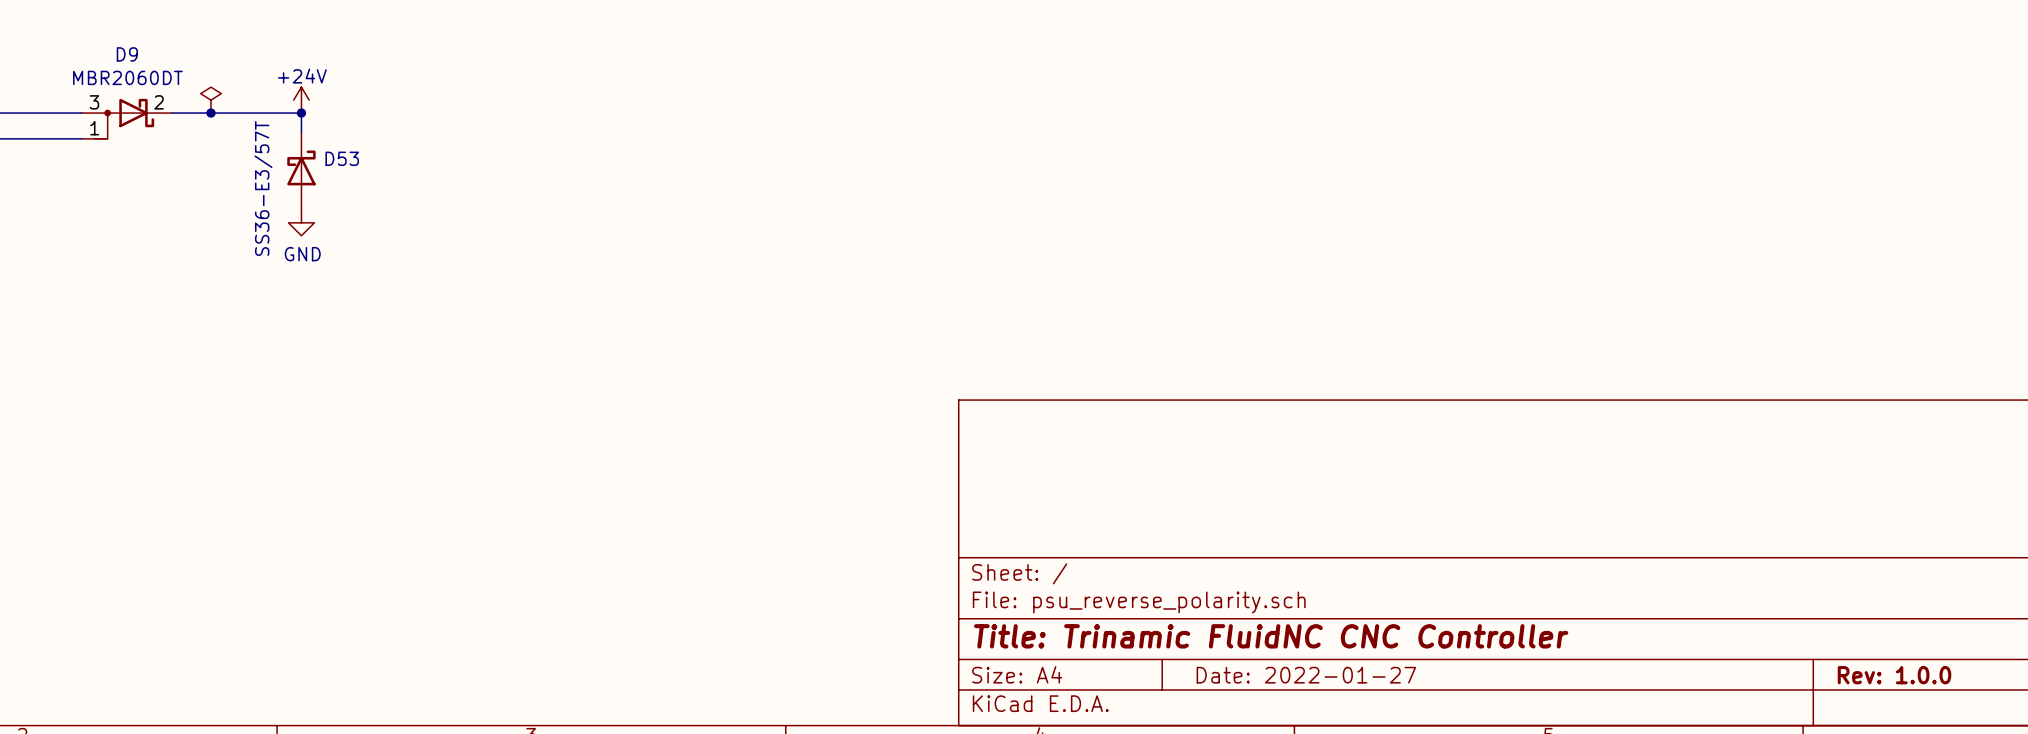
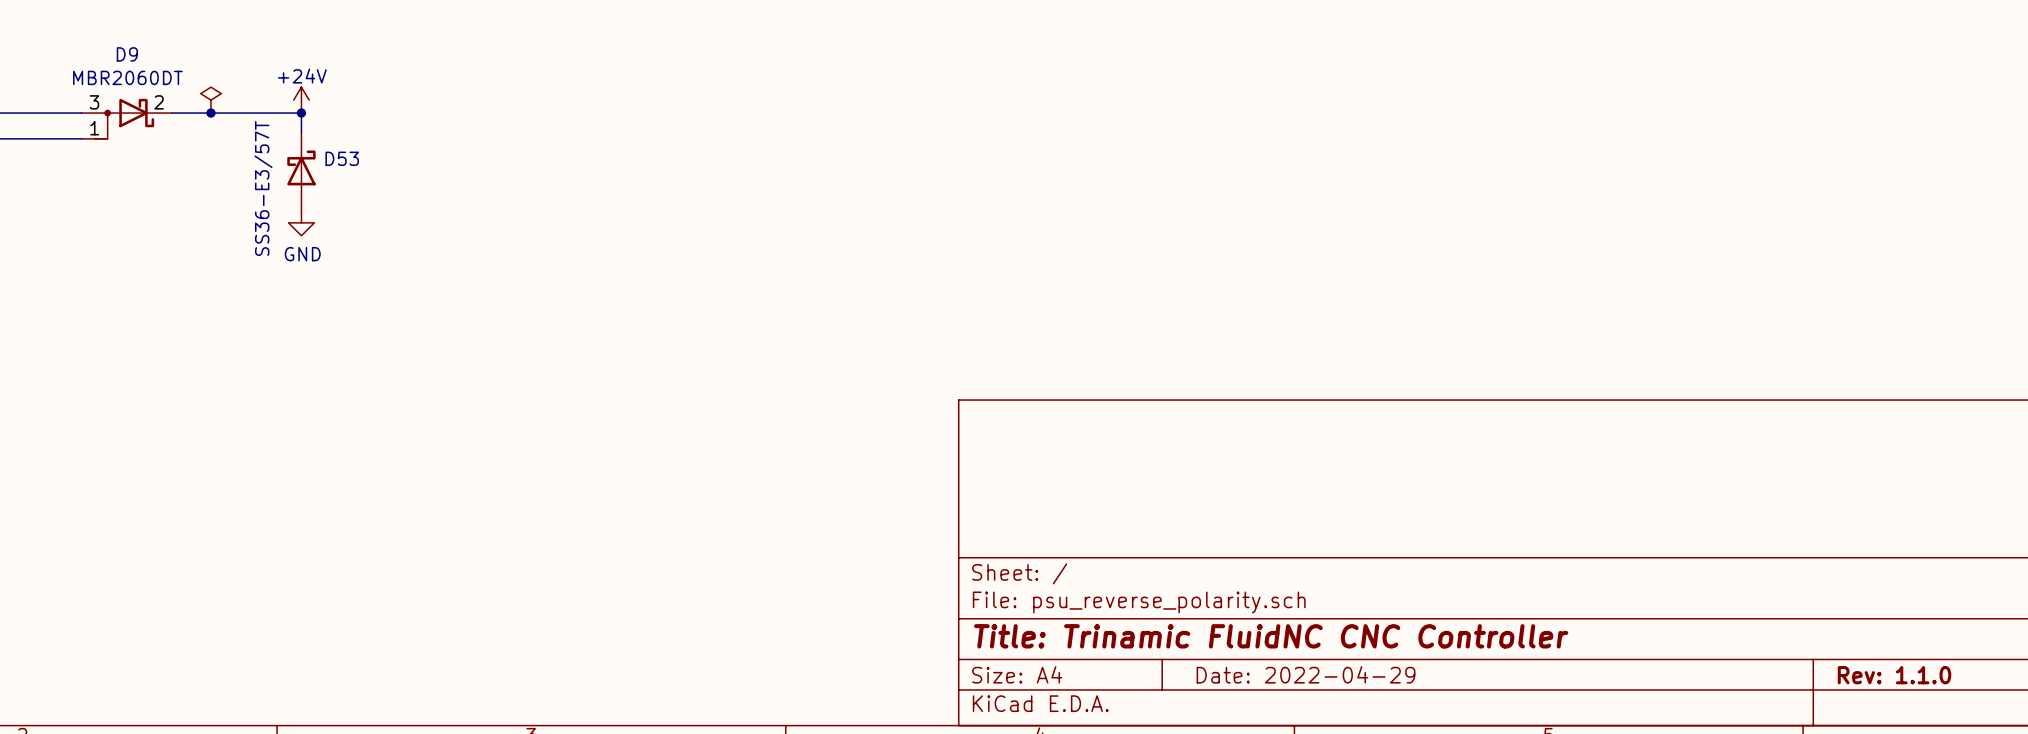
title block: Date: 2022-01-27 (1306, 675) -> Date: 2022-04-29 (1306, 674)
title block: Rev: 1.0.0 (1894, 675) -> Rev: 1.1.0 (1894, 675)

